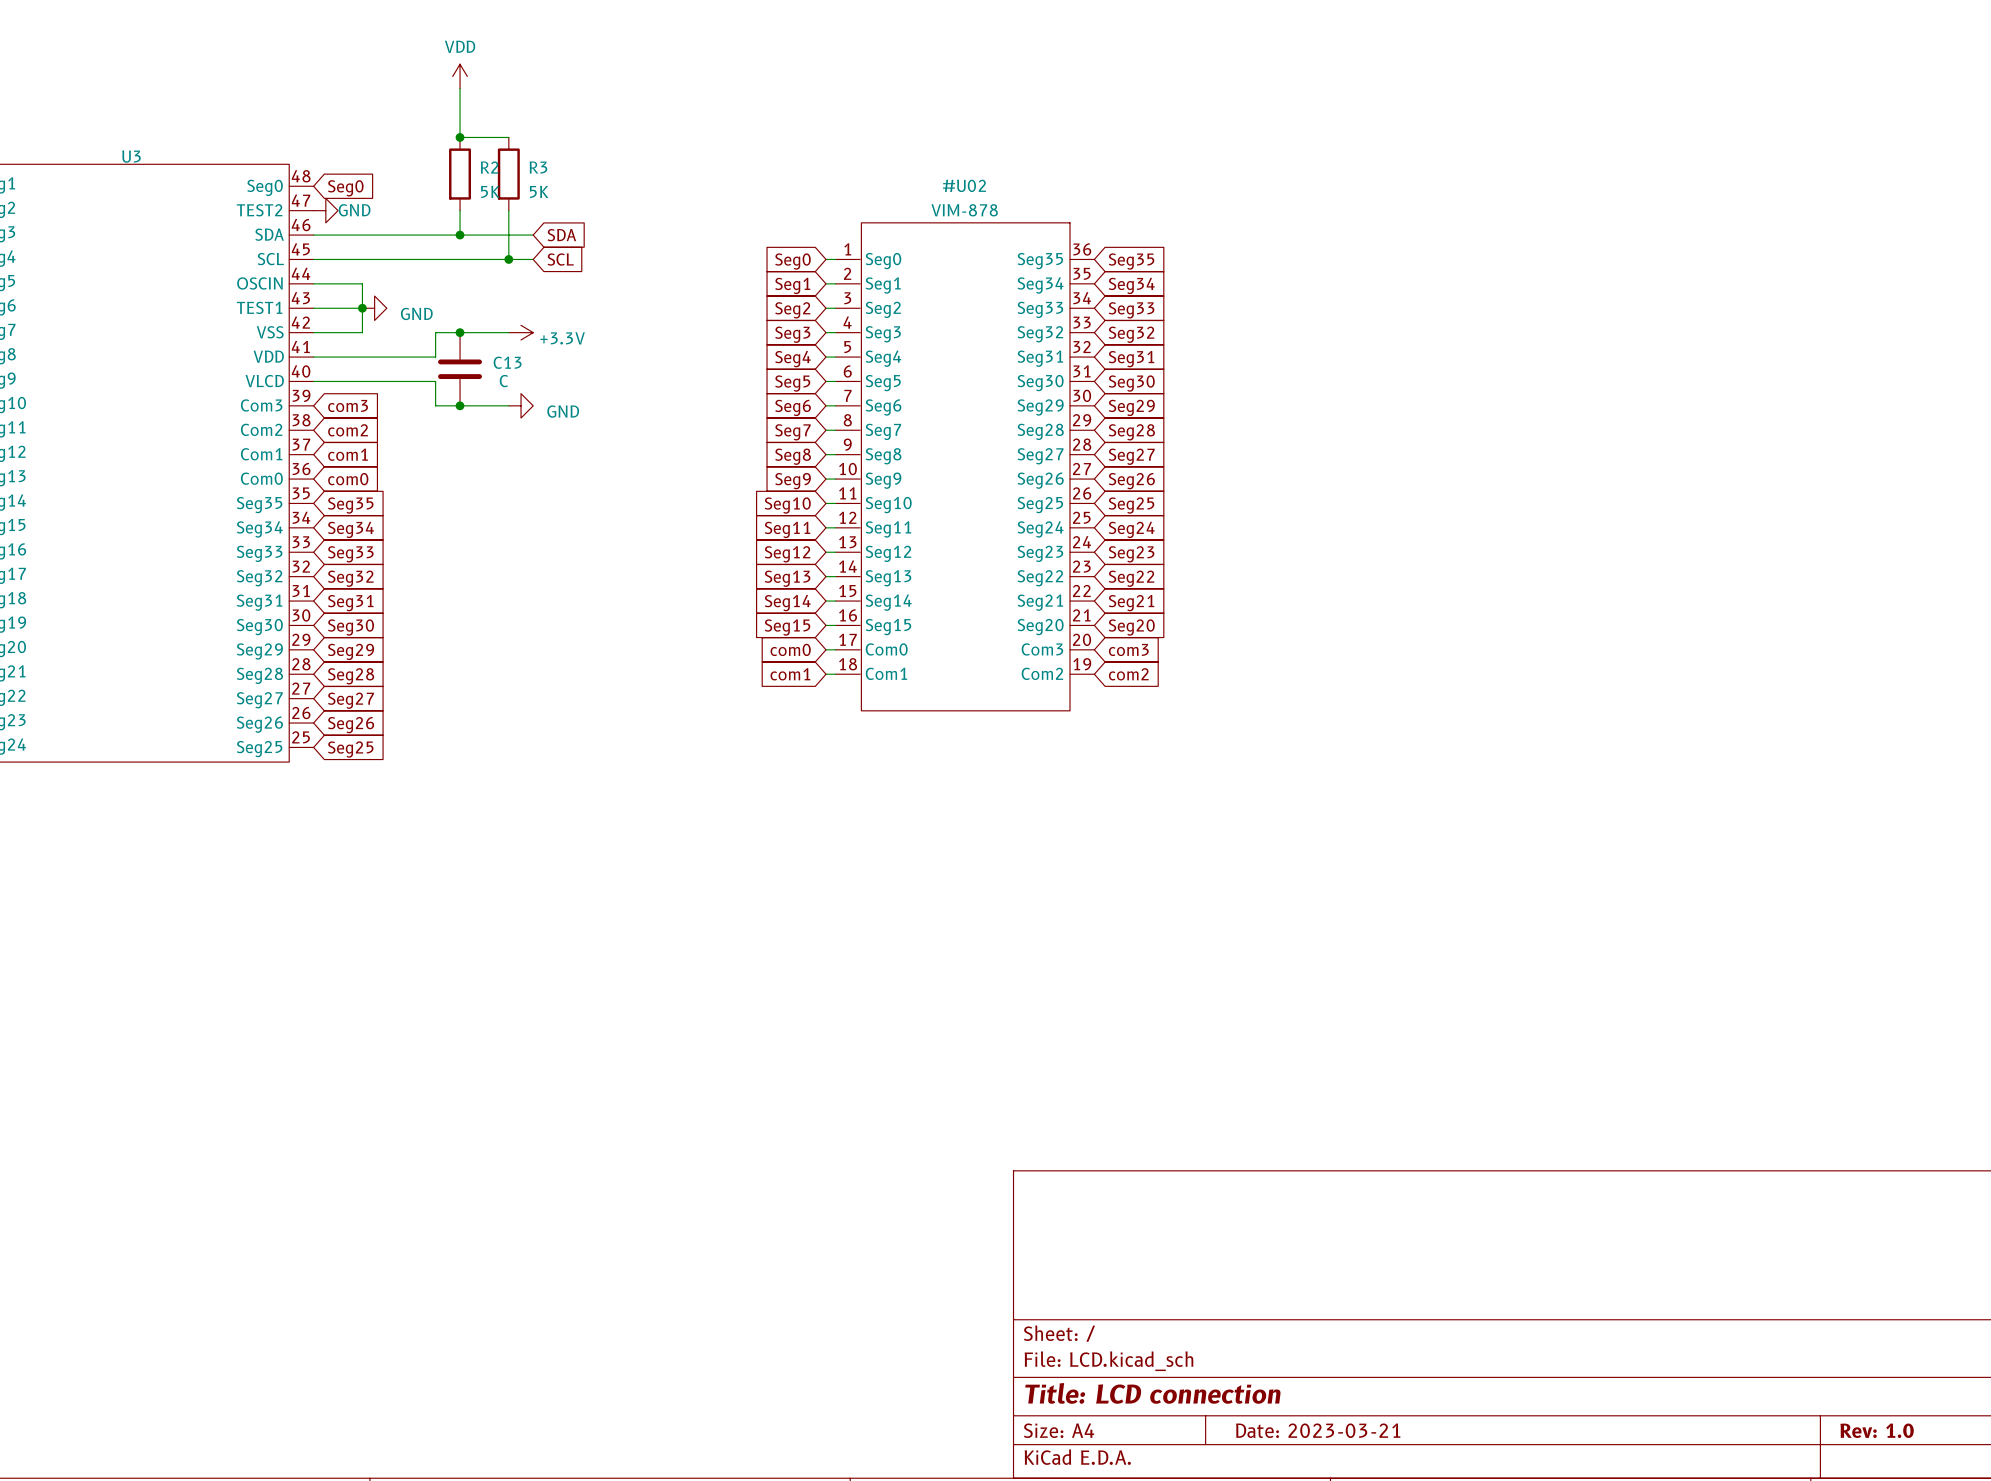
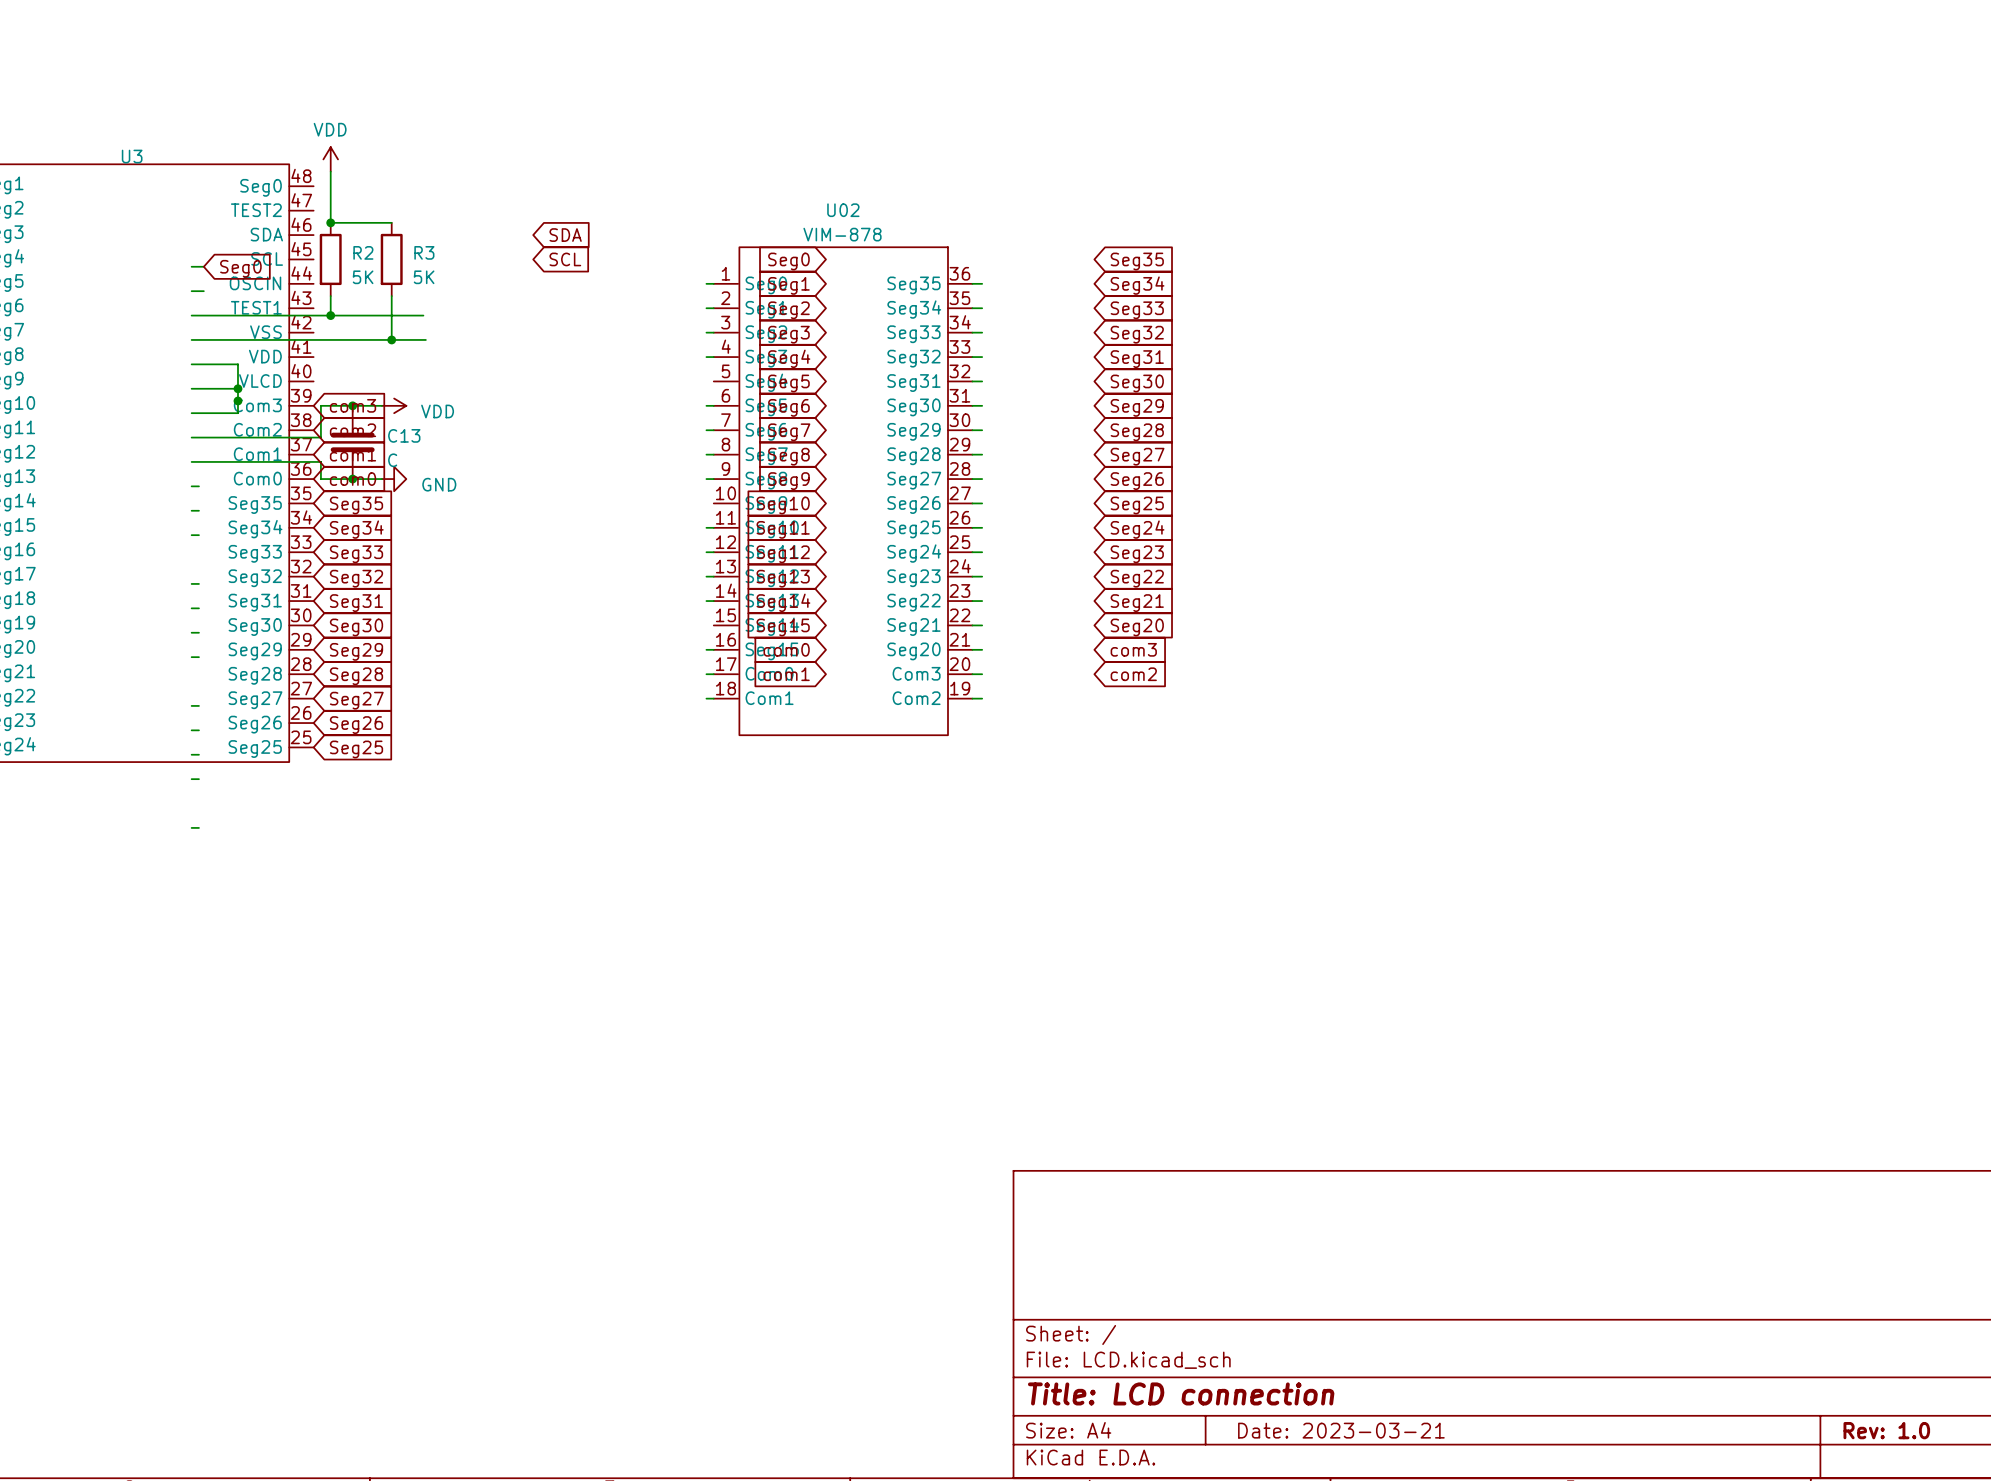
power symbol position: VDD (460, 76) -> VDD (330, 159)
wire: (460, 88) (460, 137) (508, 137) -> none
junction: (460, 137) -> none
wire: none -> (330, 171) (330, 222) (391, 222)
R2 position: (460, 174) -> (330, 259)
R3 position: (508, 174) -> (391, 259)
global label position: Seg0 (345, 188) -> Seg0 (240, 268)
power symbol: GND (325, 210) -> none
wire: (460, 210) (460, 235) -> none
wire: (508, 210) (508, 259) -> none
junction: none -> (330, 222)
drawing: [835, 222, 1095, 711] -> none
wire: (313, 235) (533, 235) -> none
junction: (460, 235) -> none
wire: (313, 259) (533, 259) -> none
junction: (508, 259) -> none
wire: (826, 259) (835, 259) -> (972, 283) (982, 283)
wire: none -> (191, 266) (203, 266)
wire: (313, 283) (362, 283) (362, 332) (313, 332) -> none
wire: none -> (706, 283) (713, 283)
wire: (826, 283) (835, 283) -> (972, 308) (982, 308)
wire: none -> (191, 291) (203, 291)
wire: none -> (330, 296) (330, 315)
wire: none -> (391, 296) (391, 339)
wire: (313, 308) (362, 308) -> none
junction: (362, 308) -> none
power symbol: GND (374, 308) -> none
wire: none -> (706, 308) (713, 308)
wire: (826, 308) (835, 308) -> (972, 332) (982, 332)
wire: none -> (191, 315) (423, 315)
junction: none -> (330, 315)
junction: (460, 332) -> none
wire: (508, 332) (435, 332) (435, 357) (313, 357) -> none
power symbol: +3.3V (521, 332) -> none
wire: none -> (706, 332) (713, 332)
wire: (826, 332) (835, 332) -> (972, 357) (982, 357)
wire: none -> (191, 339) (425, 339)
junction: none -> (391, 339)
wire: none -> (706, 357) (713, 357)
wire: (826, 357) (835, 357) -> (972, 381) (982, 381)
wire: none -> (191, 364) (237, 364) (237, 413) (191, 413)
C13 position: (460, 369) -> (352, 442)
wire: (313, 381) (435, 381) (435, 405) (508, 405) -> none
C13 value position: C (503, 381) -> C (392, 460)
wire: (826, 381) (835, 381) -> (972, 405) (982, 405)
wire: none -> (191, 388) (237, 388)
junction: none -> (237, 388)
junction: none -> (237, 400)
junction: none -> (352, 405)
wire: none -> (381, 405) (320, 405) (320, 437) (191, 437)
power symbol: none -> VDD (394, 405)
junction: (460, 405) -> none
power symbol: GND (521, 405) -> none
wire: none -> (706, 405) (713, 405)
wire: (826, 405) (835, 405) -> (972, 430) (982, 430)
wire: none -> (706, 430) (713, 430)
wire: (826, 430) (835, 430) -> (972, 454) (982, 454)
wire: none -> (706, 454) (713, 454)
wire: (826, 454) (835, 454) -> (972, 479) (982, 479)
wire: none -> (191, 461) (320, 461) (320, 479) (381, 479)
junction: none -> (352, 479)
power symbol: none -> GND (394, 479)
wire: none -> (706, 479) (713, 479)
wire: (826, 479) (835, 479) -> (972, 503) (982, 503)
wire: none -> (191, 486) (198, 486)
U02: none -> VIM-878 (843, 491)
wire: (826, 503) (835, 503) -> (972, 527) (982, 527)
wire: none -> (191, 510) (198, 510)
wire: none -> (706, 527) (713, 527)
wire: (826, 527) (835, 527) -> (972, 552) (982, 552)
wire: none -> (191, 535) (198, 535)
wire: none -> (706, 552) (713, 552)
wire: (826, 552) (835, 552) -> (972, 576) (982, 576)
wire: none -> (706, 576) (713, 576)
wire: (826, 576) (835, 576) -> (972, 601) (982, 601)
wire: none -> (191, 583) (198, 583)
wire: none -> (706, 601) (713, 601)
wire: (826, 601) (835, 601) -> (972, 625) (982, 625)
wire: none -> (191, 608) (198, 608)
wire: (826, 625) (835, 625) -> (972, 649) (982, 649)
wire: none -> (191, 632) (198, 632)
wire: none -> (706, 649) (713, 649)
wire: (826, 649) (835, 649) -> (972, 674) (982, 674)
wire: none -> (191, 657) (198, 657)
wire: none -> (706, 674) (713, 674)
wire: (826, 674) (835, 674) -> (972, 698) (982, 698)
wire: none -> (706, 698) (713, 698)
wire: none -> (191, 705) (198, 705)
wire: none -> (191, 730) (198, 730)
wire: none -> (191, 754) (198, 754)
wire: none -> (191, 779) (198, 779)
wire: none -> (191, 827) (198, 827)

